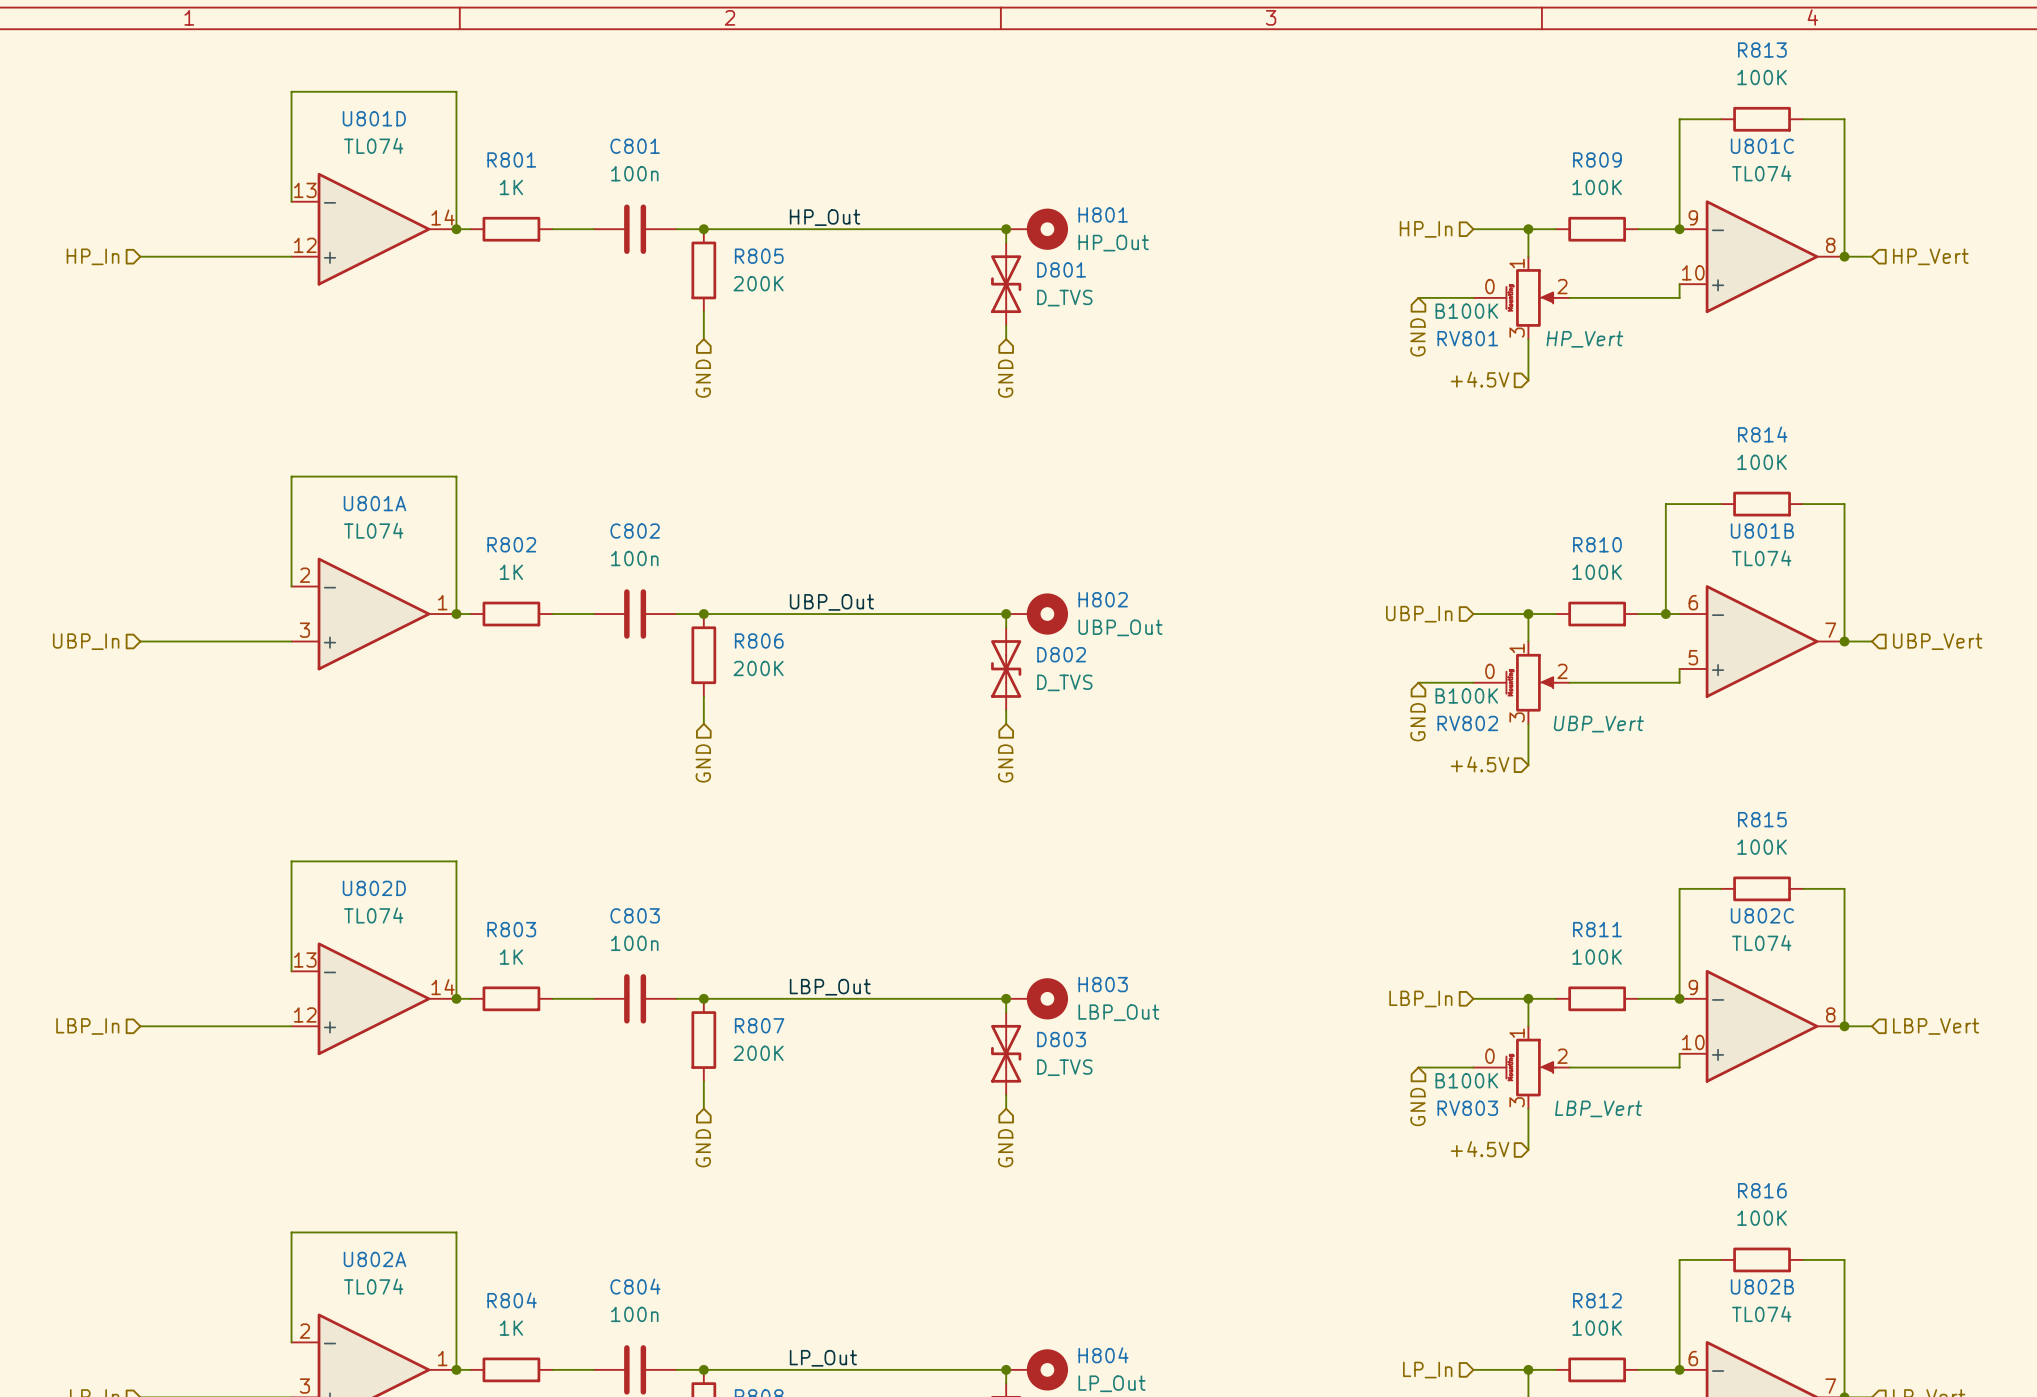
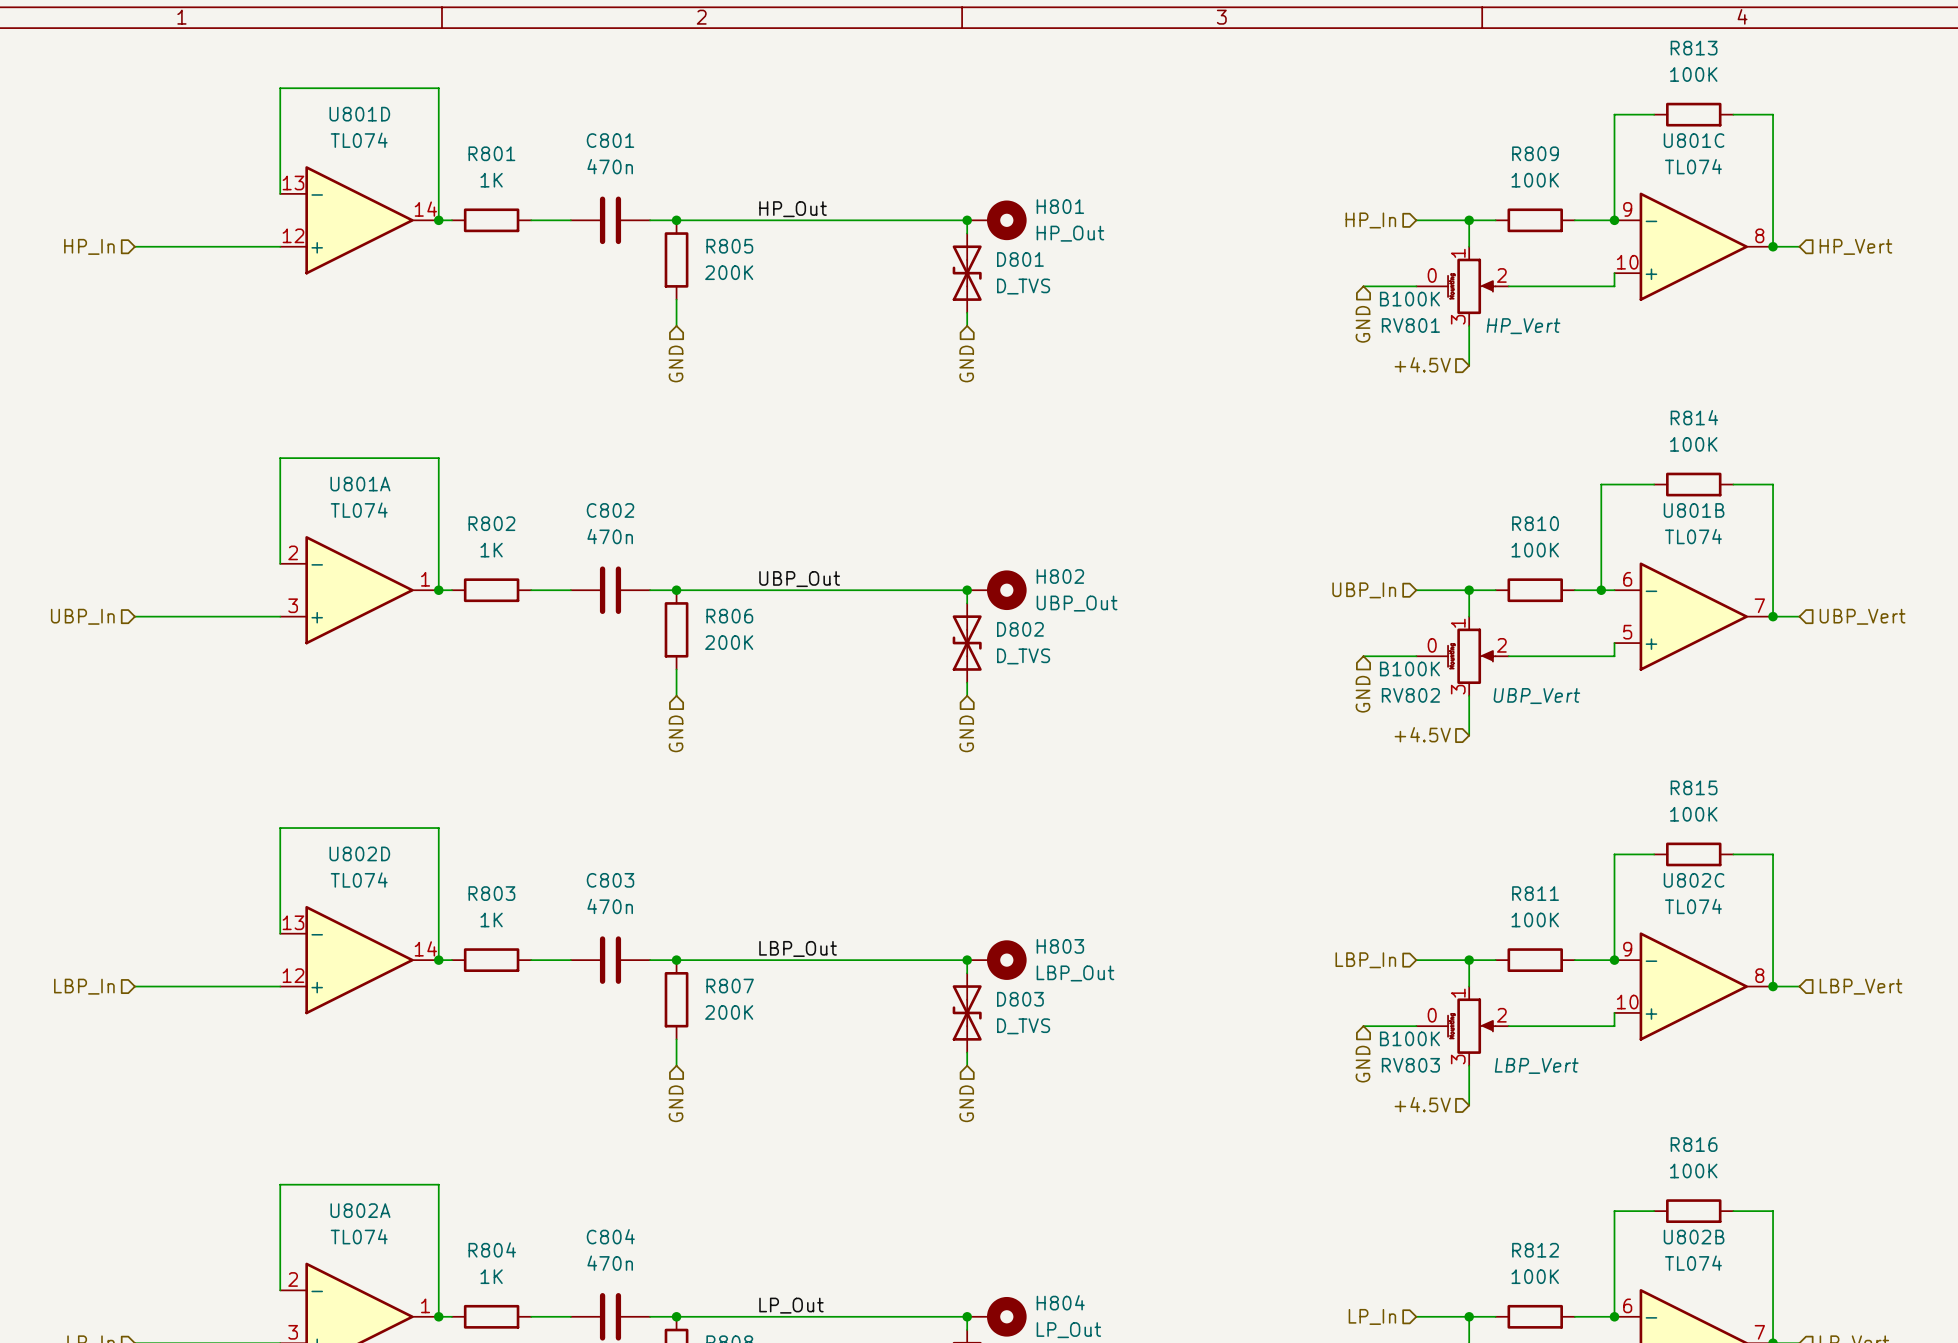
C801 value: 100n (634, 173) -> 470n (610, 166)
C802 value: 100n (634, 558) -> 470n (610, 536)
C803 value: 100n (634, 943) -> 470n (610, 906)
C804 value: 100n (634, 1314) -> 470n (610, 1263)

